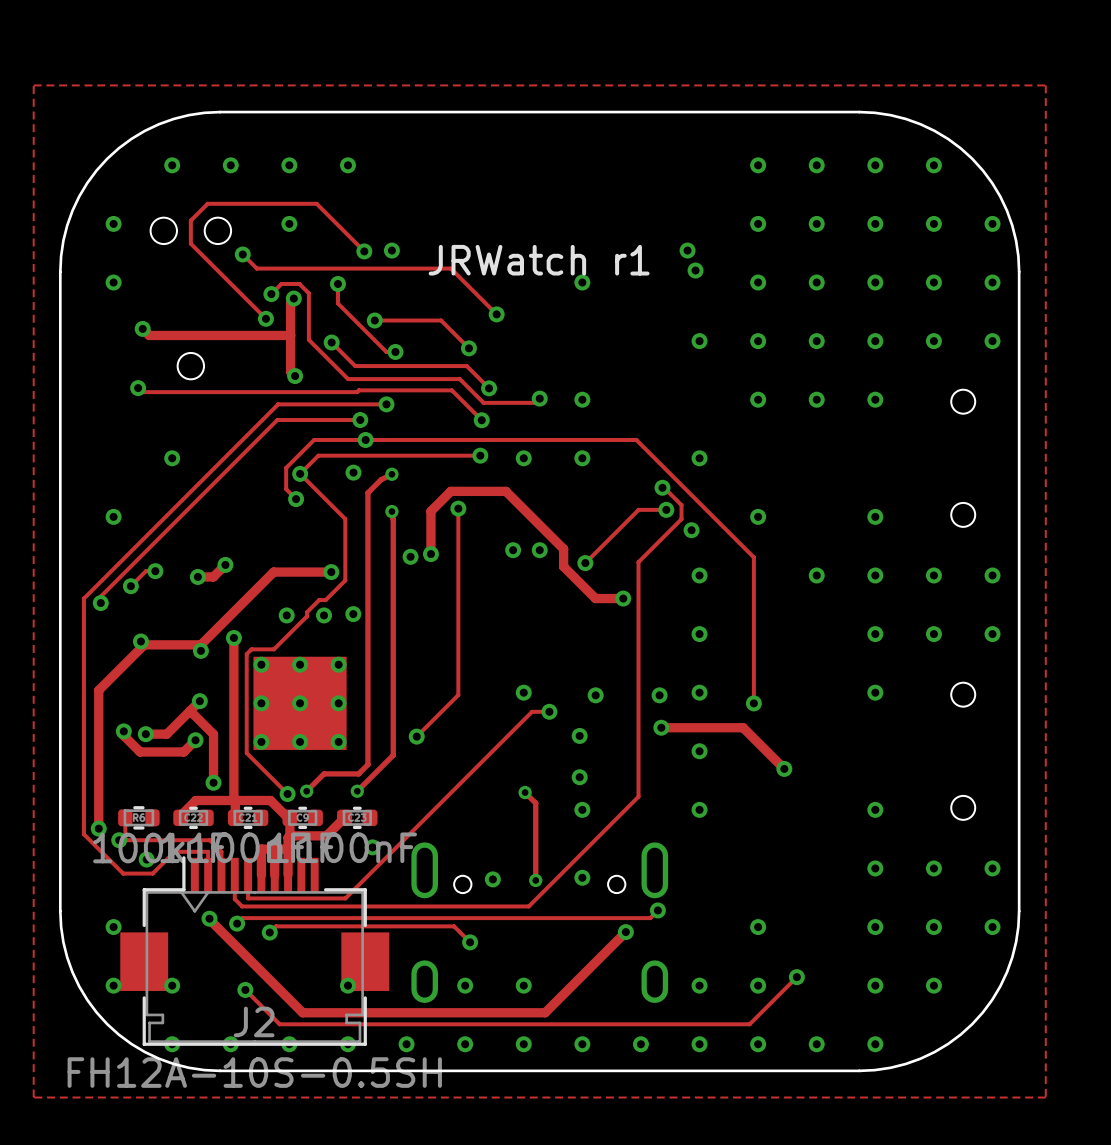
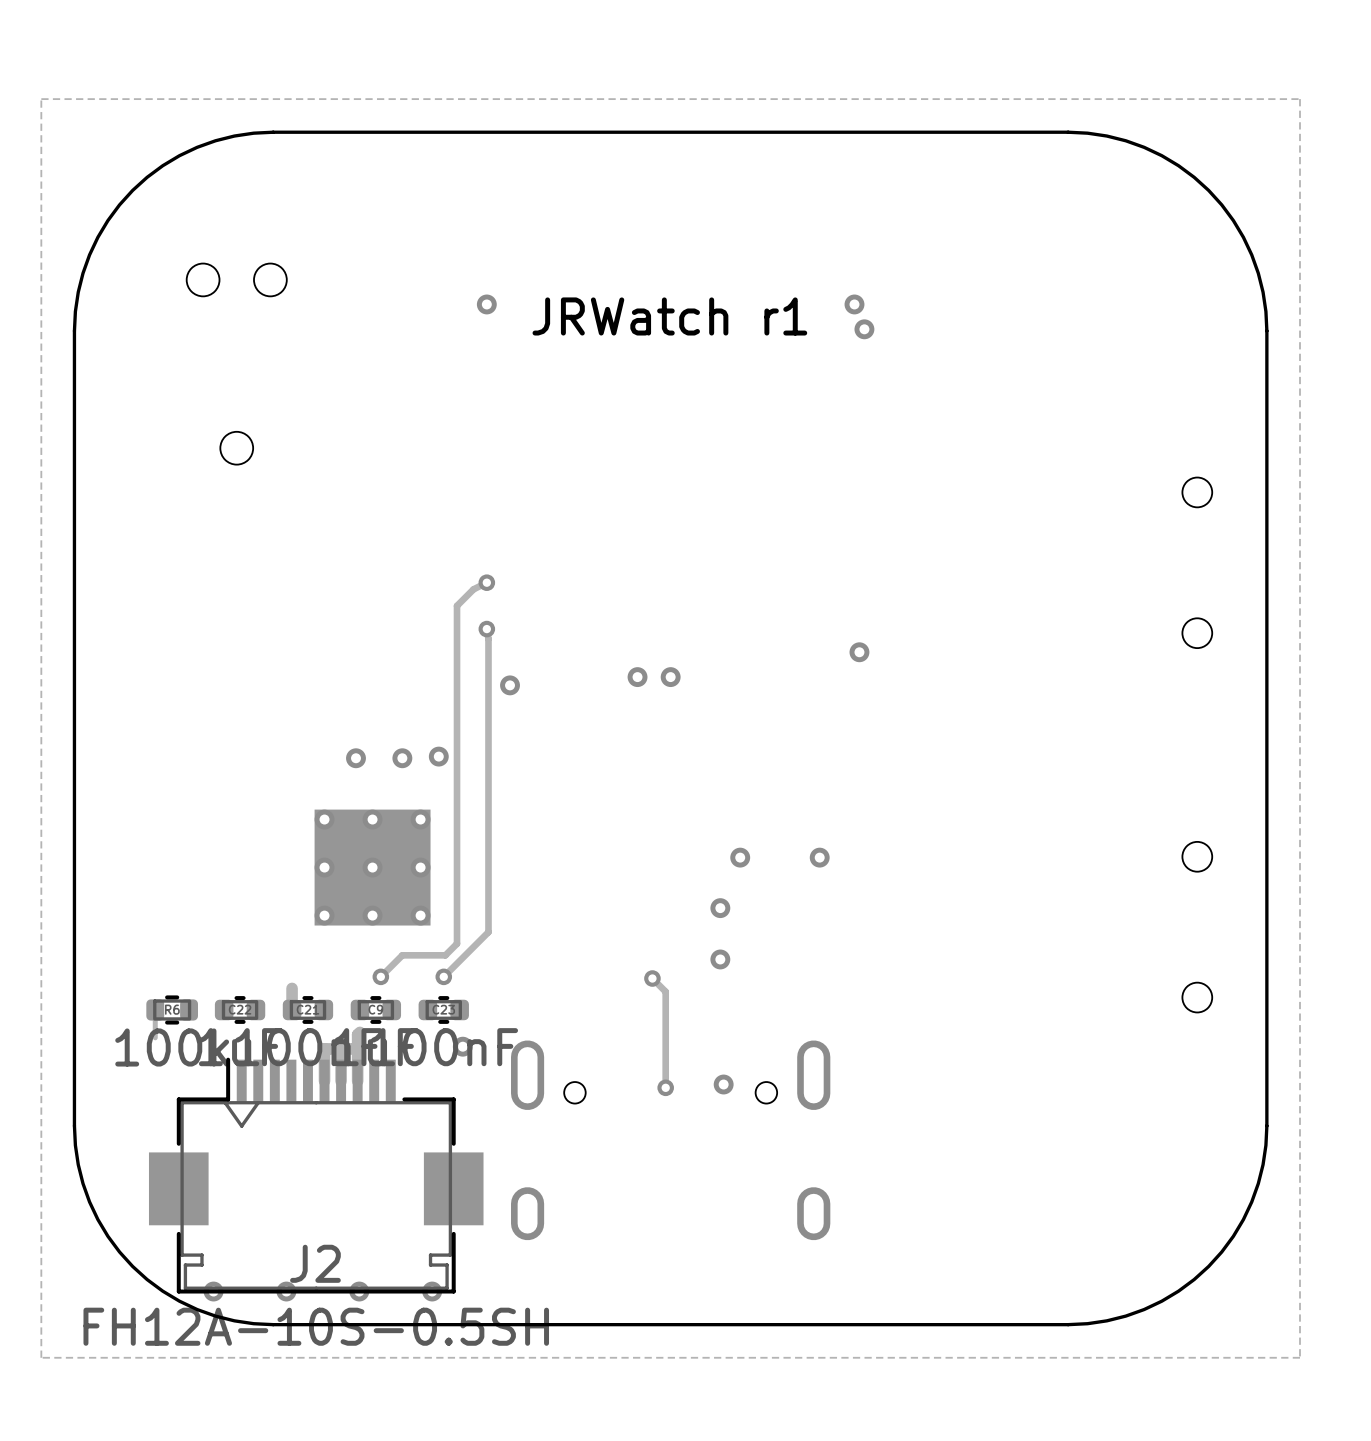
via: (172, 165) -> none
via: (230, 165) -> none
via: (289, 165) -> none
via: (347, 165) -> none
via: (758, 165) -> none
via: (816, 165) -> none
via: (875, 165) -> none
via: (933, 165) -> none
via: (113, 223) -> none
via: (289, 223) -> none
via: (758, 223) -> none
via: (816, 223) -> none
via: (875, 223) -> none
via: (933, 223) -> none
via: (992, 223) -> none
track: (364, 251) (316, 203) (207, 203) (190, 220) (190, 243) (265, 318) -> none
via: (364, 251) -> none
track: (242, 254) (256, 268) (450, 268) (496, 314) -> none
via: (242, 254) -> none
via: (113, 282) -> none
via: (582, 282) -> none
via: (758, 282) -> none
via: (816, 282) -> none
via: (875, 282) -> none
via: (933, 282) -> none
via: (992, 282) -> none
track: (337, 283) (337, 303) (386, 351) (395, 351) -> none
via: (337, 283) -> none
track: (271, 294) (281, 283) (299, 283) (308, 293) (308, 339) (348, 379) (459, 379) (483, 402) (535, 402) (539, 398) -> none
via: (271, 294) -> none
track: (293, 298) (290, 301) (290, 371) (295, 376) -> none
via: (293, 298) -> none
via: (496, 314) -> none
via: (265, 318) -> none
track: (374, 320) (441, 320) (468, 348) -> none
via: (374, 320) -> none
track: (142, 328) (149, 335) (290, 335) -> none
via: (142, 328) -> none
via: (699, 341) -> none
via: (758, 341) -> none
via: (816, 341) -> none
via: (875, 341) -> none
via: (933, 341) -> none
via: (992, 341) -> none
track: (331, 342) (355, 366) (466, 366) (489, 388) -> none
via: (331, 342) -> none
via: (468, 348) -> none
via: (395, 351) -> none
via: (295, 376) -> none
track: (138, 388) (142, 392) (451, 390) (481, 420) -> none
via: (138, 388) -> none
via: (489, 388) -> none
via: (539, 398) -> none
via: (582, 399) -> none
via: (758, 399) -> none
via: (816, 399) -> none
via: (875, 399) -> none
track: (386, 404) (278, 404) (83, 598) (83, 834) (123, 873) (152, 873) (174, 851) (208, 851) (208, 875) -> none
via: (386, 404) -> none
track: (360, 420) (277, 420) (100, 596) (100, 603) -> none
via: (360, 420) -> none
via: (481, 420) -> none
via: (365, 439) -> none
track: (480, 455) (318, 455) (300, 473) (345, 519) (345, 580) (325, 600) (319, 600) (306, 612) (306, 616) (273, 649) (251, 649) (246, 654) (246, 753) (287, 794) -> none
via: (480, 455) -> none
via: (172, 458) -> none
via: (523, 458) -> none
via: (582, 458) -> none
via: (699, 458) -> none
via: (353, 472) -> none
via: (300, 473) -> none
track: (662, 487) (681, 505) (681, 519) (638, 562) (638, 796) (528, 906) (242, 906) (234, 899) (234, 875) -> none
via: (662, 487) -> none
track: (296, 499) (286, 489) (286, 467) (314, 439) (636, 439) (753, 557) (753, 703) -> none
via: (296, 499) -> none
track: (458, 508) (458, 695) (416, 736) -> none
via: (458, 508) -> none
track: (666, 509) (638, 509) (585, 563) -> none
via: (666, 509) -> none
via: (113, 516) -> none
via: (758, 516) -> none
via: (875, 516) -> none
track: (430, 554) (430, 511) (450, 491) (505, 491) (563, 549) (563, 566) (595, 598) (623, 598) -> none
via: (430, 554) -> none
via: (585, 563) -> none
track: (225, 564) (213, 576) (197, 576) -> none
via: (225, 564) -> none
track: (155, 571) (145, 571) (130, 586) -> none
via: (155, 571) -> none
track: (331, 572) (273, 572) (200, 644) -> none
via: (331, 572) -> none
via: (699, 575) -> none
via: (816, 575) -> none
via: (875, 575) -> none
via: (933, 575) -> none
via: (992, 575) -> none
via: (197, 576) -> none
via: (130, 586) -> none
via: (623, 598) -> none
via: (100, 603) -> none
via: (699, 634) -> none
via: (875, 634) -> none
via: (933, 634) -> none
via: (992, 634) -> none
track: (233, 637) (233, 800) -> none
via: (233, 637) -> none
via: (140, 641) -> none
track: (144, 644) (200, 644) -> none
track: (144, 644) (98, 690) (98, 828) -> none
via: (200, 650) -> none
via: (523, 692) -> none
via: (699, 692) -> none
via: (875, 692) -> none
track: (199, 701) (166, 734) (145, 734) -> none
via: (199, 701) -> none
via: (753, 703) -> none
track: (190, 710) (213, 734) (213, 782) -> none
track: (549, 711) (532, 711) (345, 898) (248, 898) (248, 875) -> none
via: (549, 711) -> none
track: (661, 727) (743, 727) (784, 768) -> none
via: (661, 727) -> none
track: (123, 731) (123, 735) (140, 751) (183, 751) (195, 740) -> none
via: (123, 731) -> none
via: (145, 734) -> none
via: (416, 736) -> none
via: (195, 740) -> none
via: (699, 751) -> none
via: (784, 768) -> none
via: (213, 782) -> none
via: (287, 794) -> none
via: (582, 809) -> none
via: (699, 809) -> none
via: (875, 809) -> none
track: (180, 817) (195, 800) (270, 800) (289, 817) (289, 835) (326, 835) (344, 817) -> none
via: (98, 828) -> none
track: (119, 840) (209, 840) (221, 851) (221, 875) -> none
via: (119, 840) -> none
via: (146, 859) -> none
via: (875, 868) -> none
via: (933, 868) -> none
via: (992, 868) -> none
via: (492, 879) -> none
track: (657, 910) (650, 918) (242, 918) (237, 923) -> none
via: (657, 910) -> none
track: (209, 918) (302, 1012) (545, 1012) (625, 932) -> none
via: (209, 918) -> none
via: (237, 923) -> none
via: (113, 927) -> none
via: (758, 927) -> none
via: (875, 927) -> none
via: (933, 927) -> none
via: (992, 927) -> none
track: (269, 932) (275, 926) (454, 926) (470, 942) -> none
via: (269, 932) -> none
via: (625, 932) -> none
via: (470, 942) -> none
track: (796, 977) (749, 1024) (279, 1024) (245, 989) -> none
via: (796, 977) -> none
via: (113, 985) -> none
via: (172, 985) -> none
via: (347, 985) -> none
via: (465, 985) -> none
via: (523, 985) -> none
via: (699, 985) -> none
via: (758, 985) -> none
via: (875, 985) -> none
via: (933, 985) -> none
via: (245, 989) -> none
via: (406, 1044) -> none
via: (465, 1044) -> none
via: (523, 1044) -> none
via: (582, 1044) -> none
via: (640, 1044) -> none
via: (699, 1044) -> none
via: (758, 1044) -> none
via: (816, 1044) -> none
via: (875, 1044) -> none

